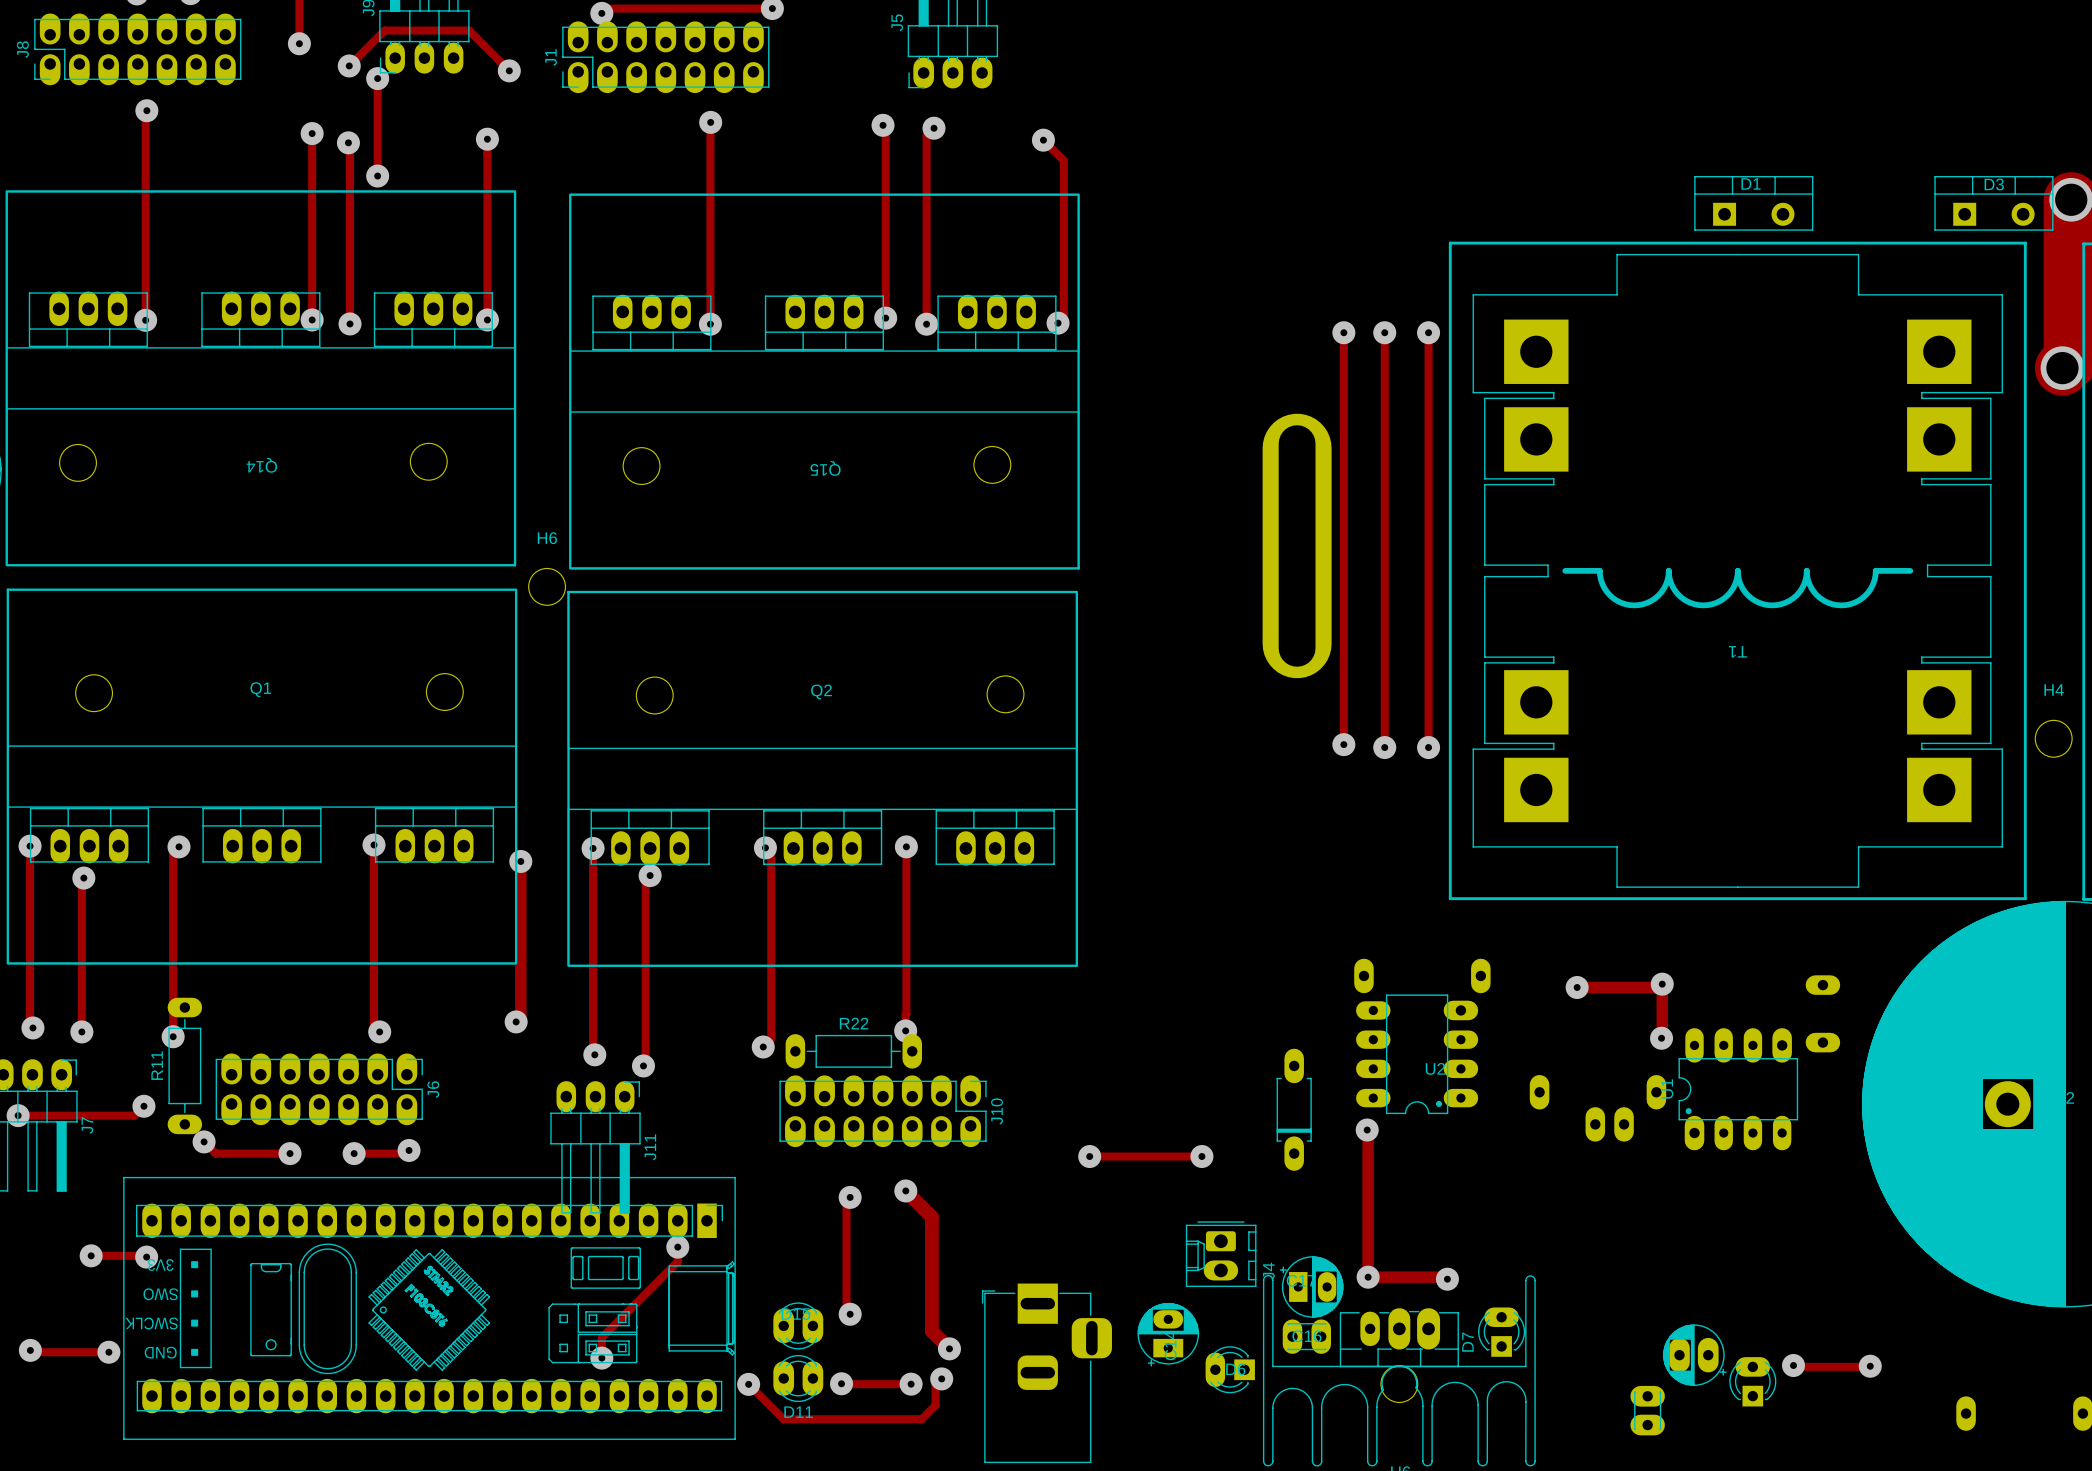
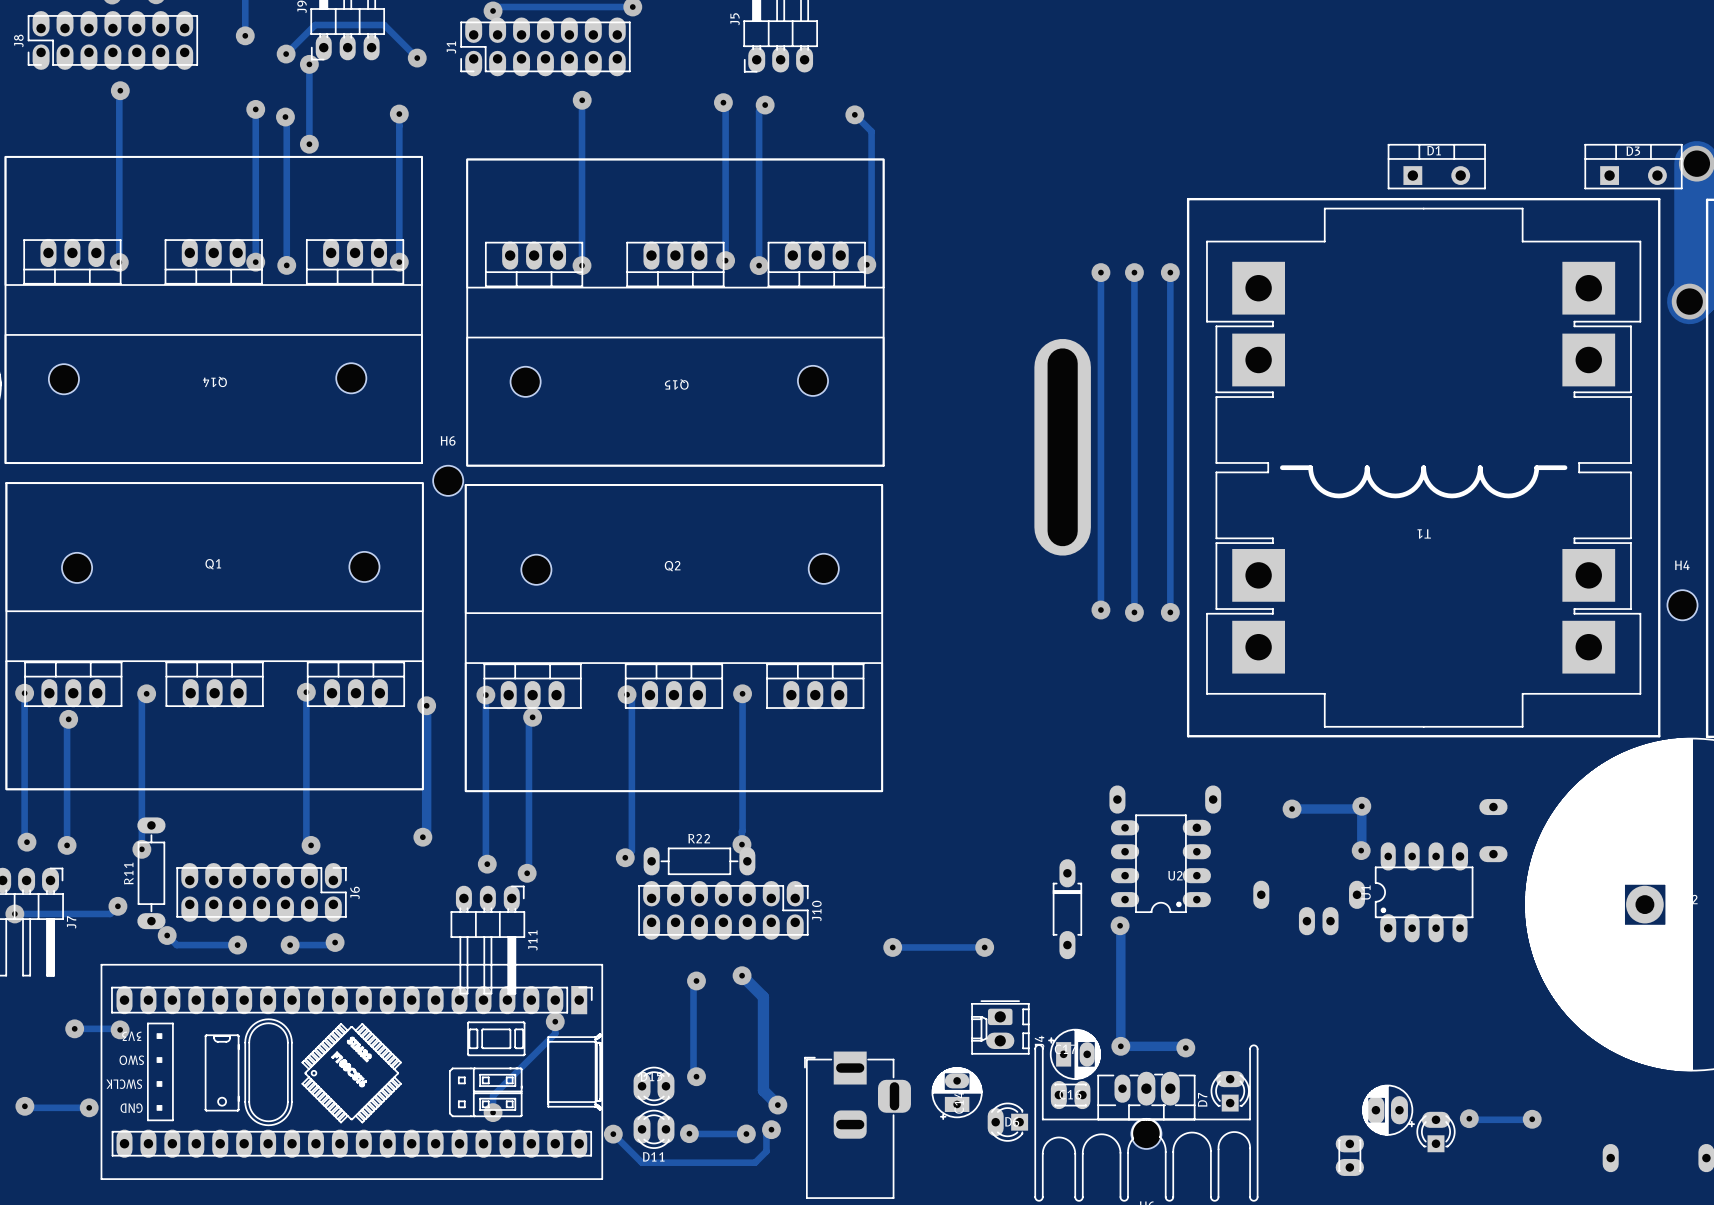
part rotation: 0° (1294, 1109) -> 180° (1067, 909)

